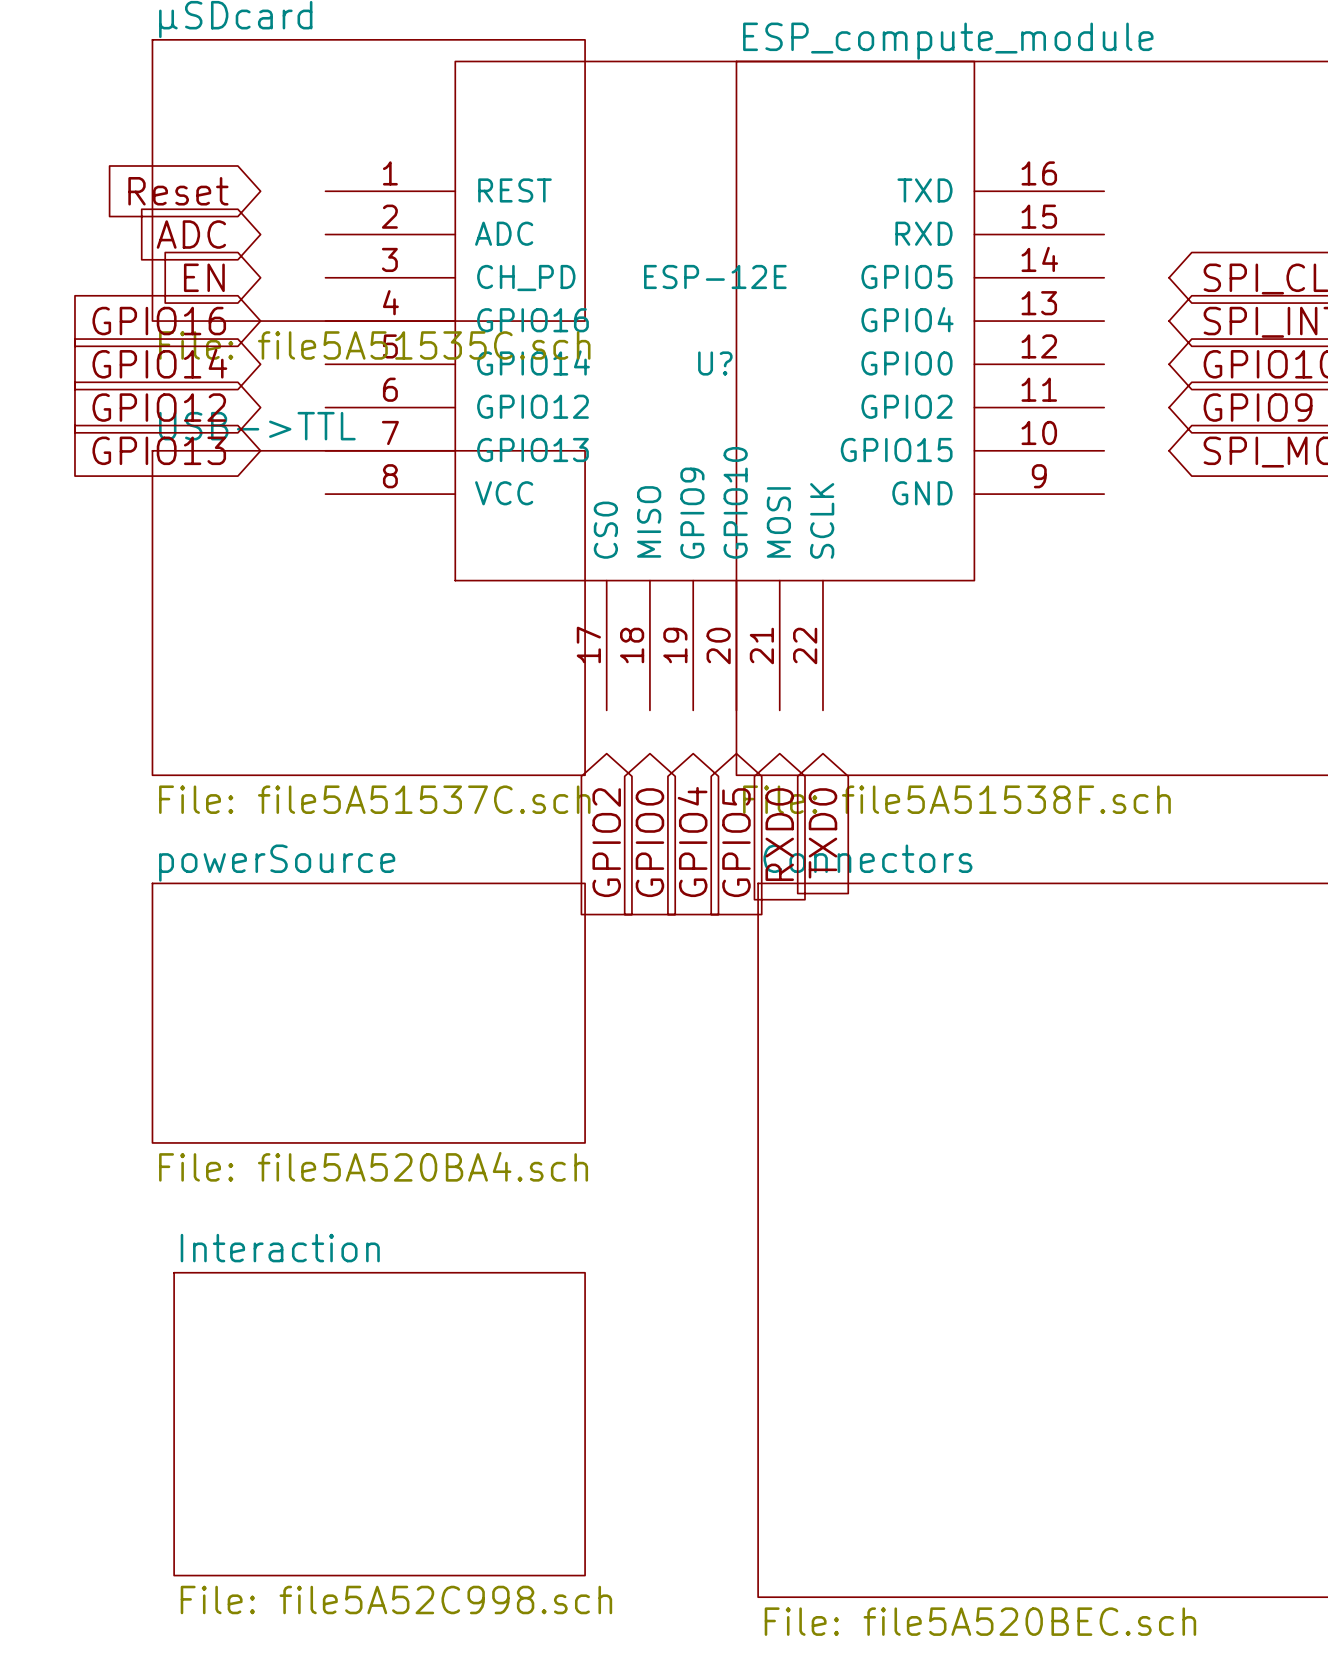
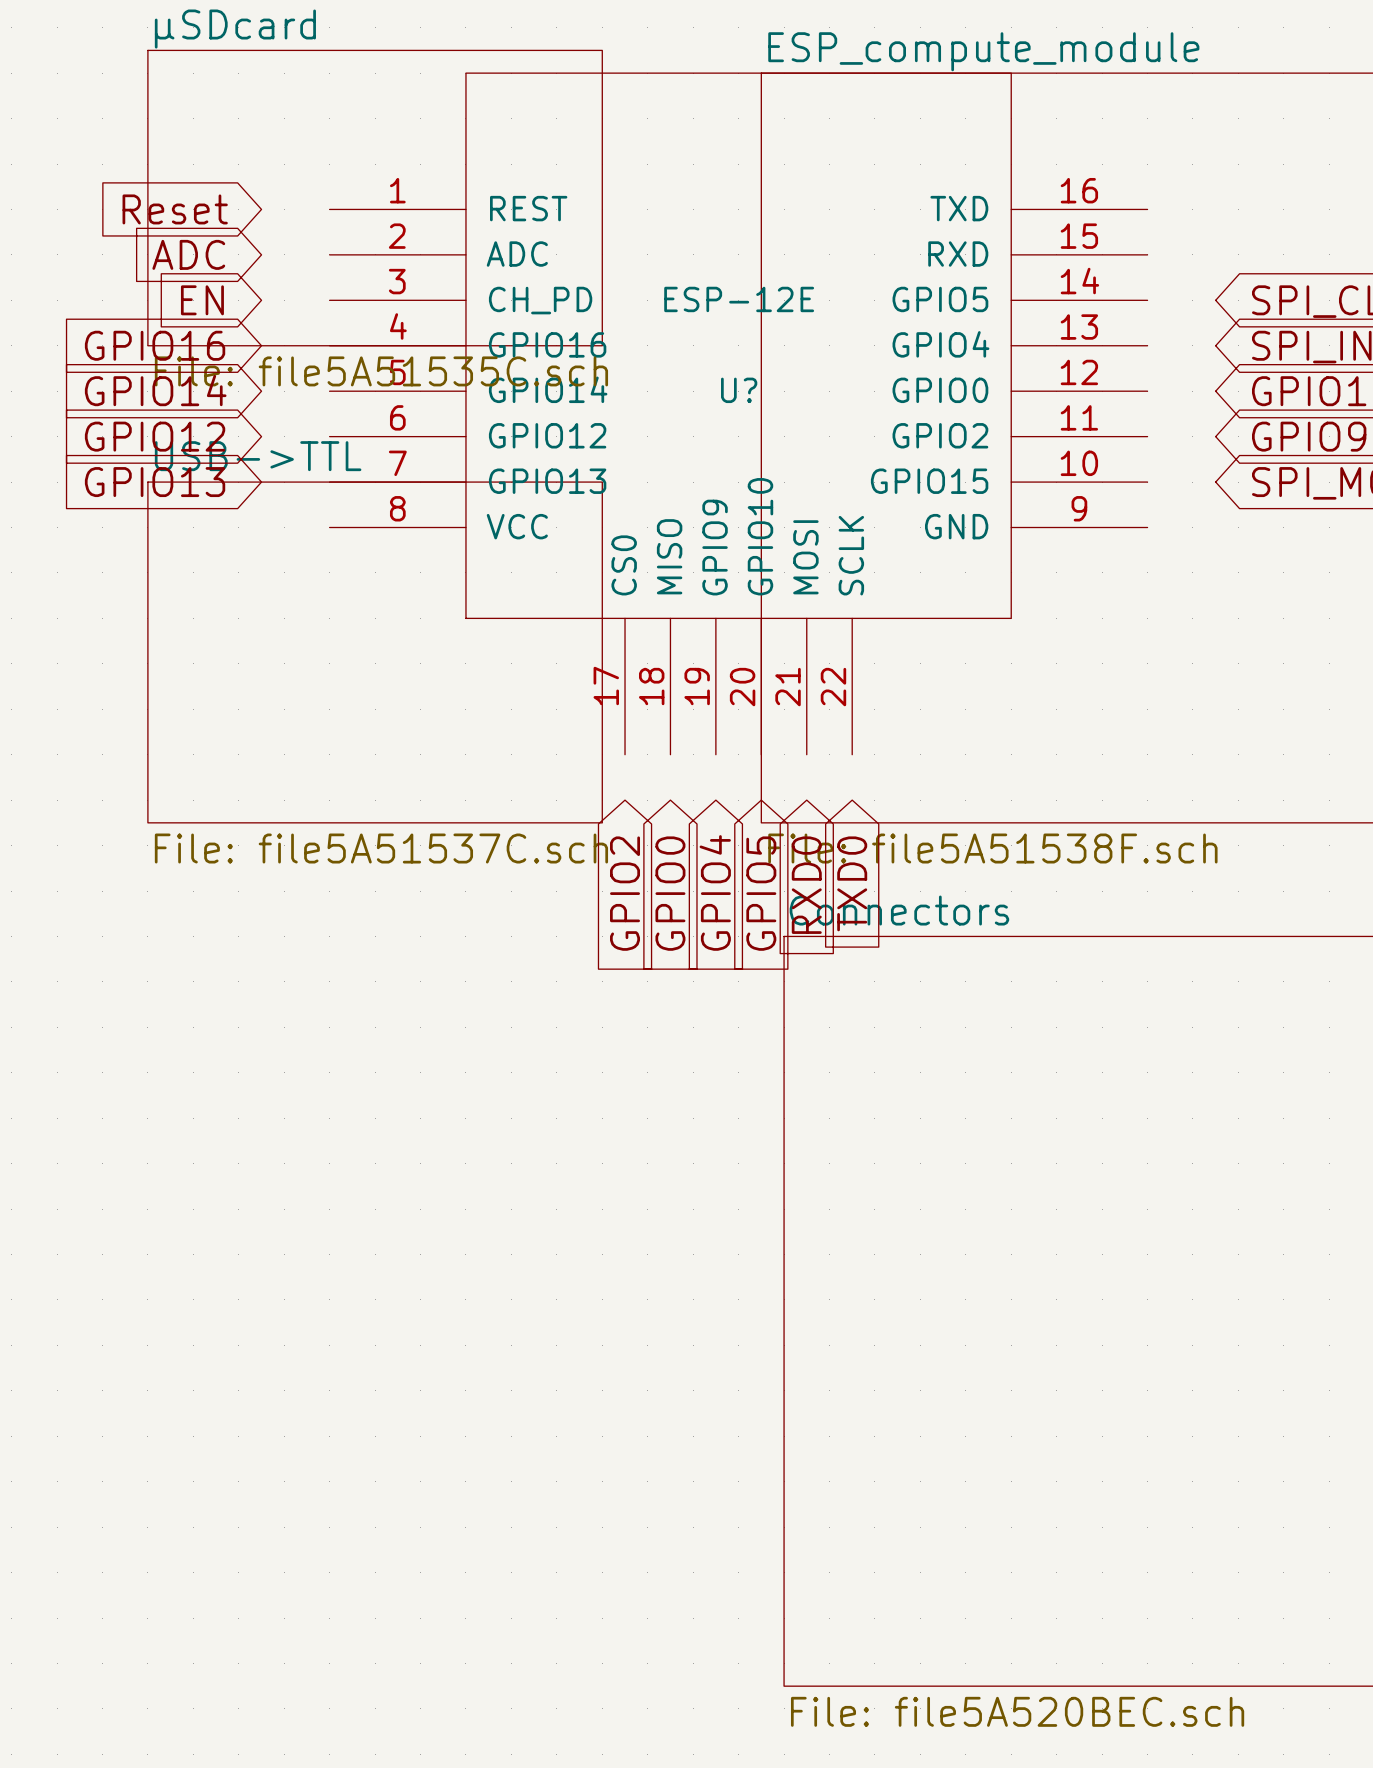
sheet powerSource: File: file5A520BA4.sch (368, 1013) -> none
sheet Interaction: File: file5A52C998.sch (379, 1424) -> none

